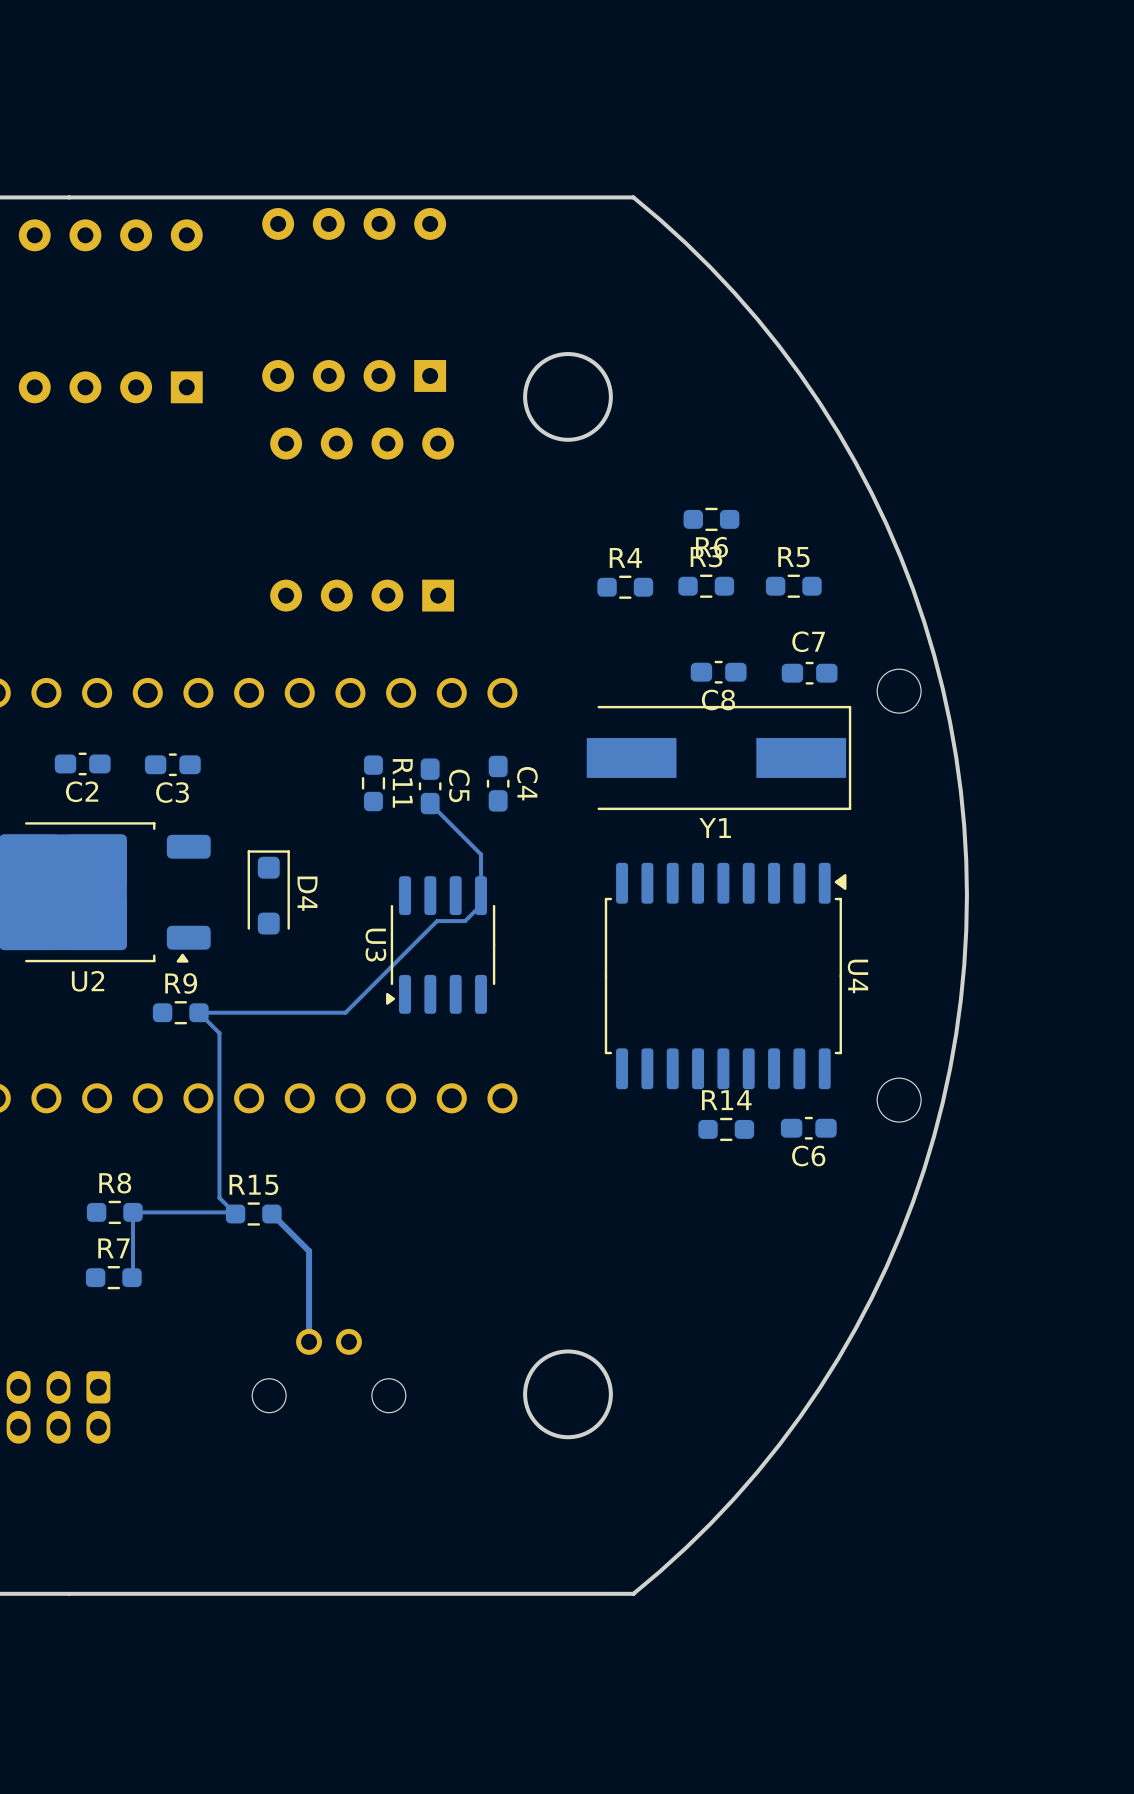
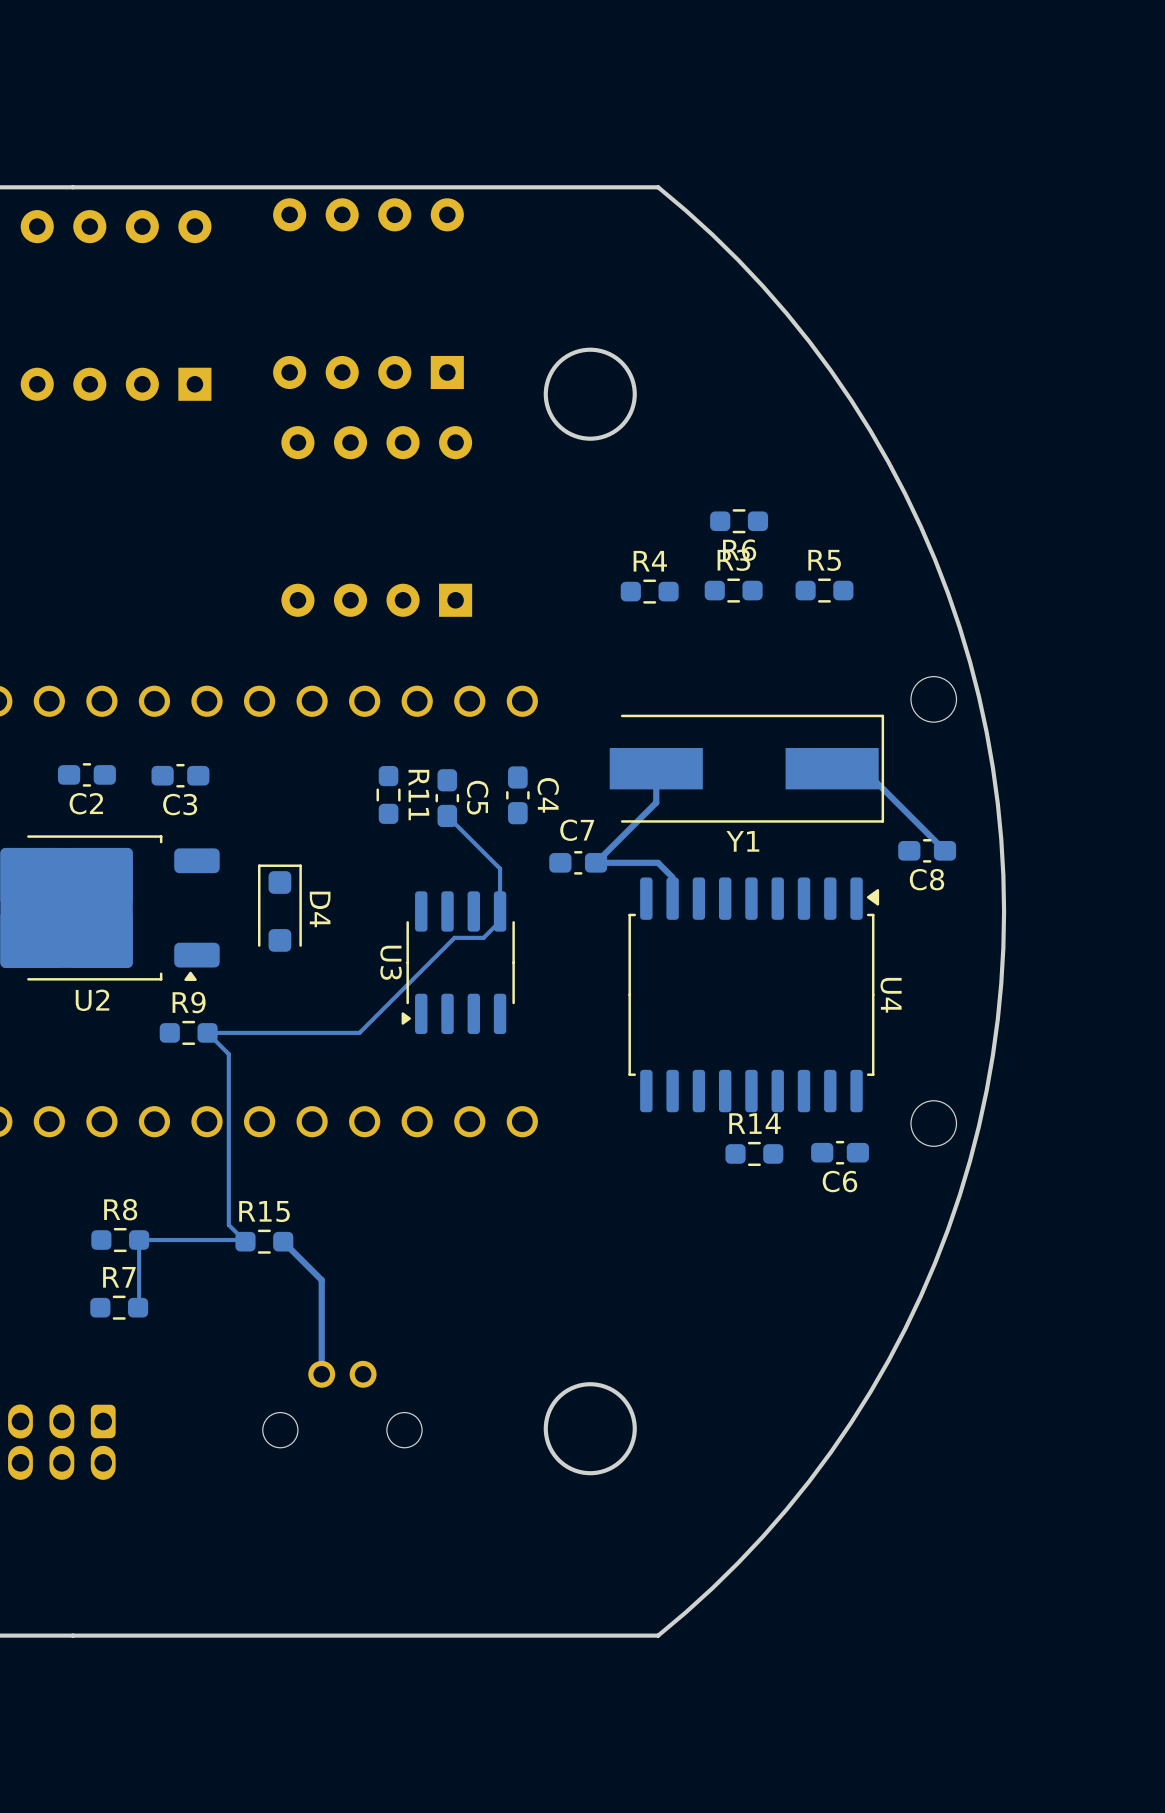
C8 position: (718, 672) -> (927, 850)
C7 position: (809, 673) -> (578, 862)
bottom track: none -> (807, 768) (862, 768) (945, 850)
bottom track: none -> (672, 785) (656, 768) (656, 802) (596, 862) (658, 862) (672, 877) (672, 898)

